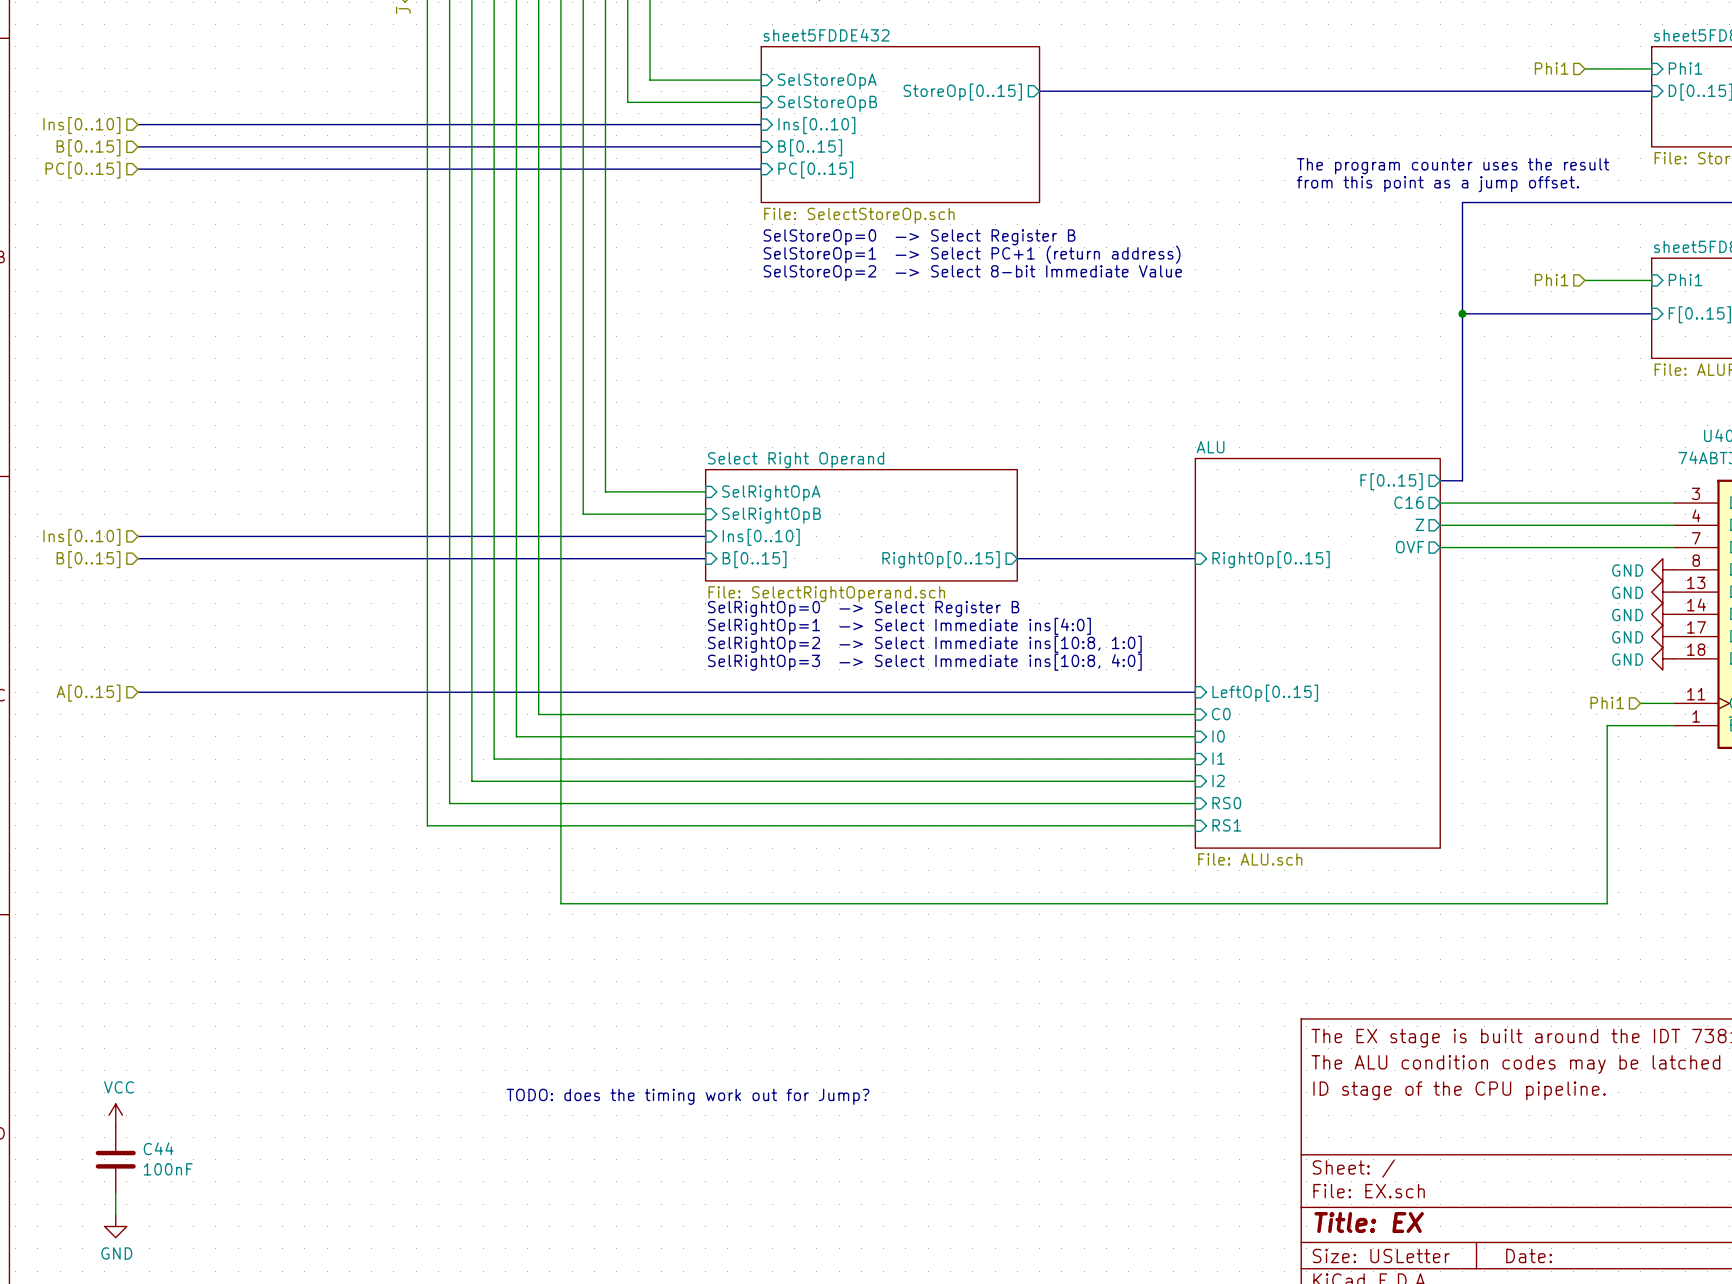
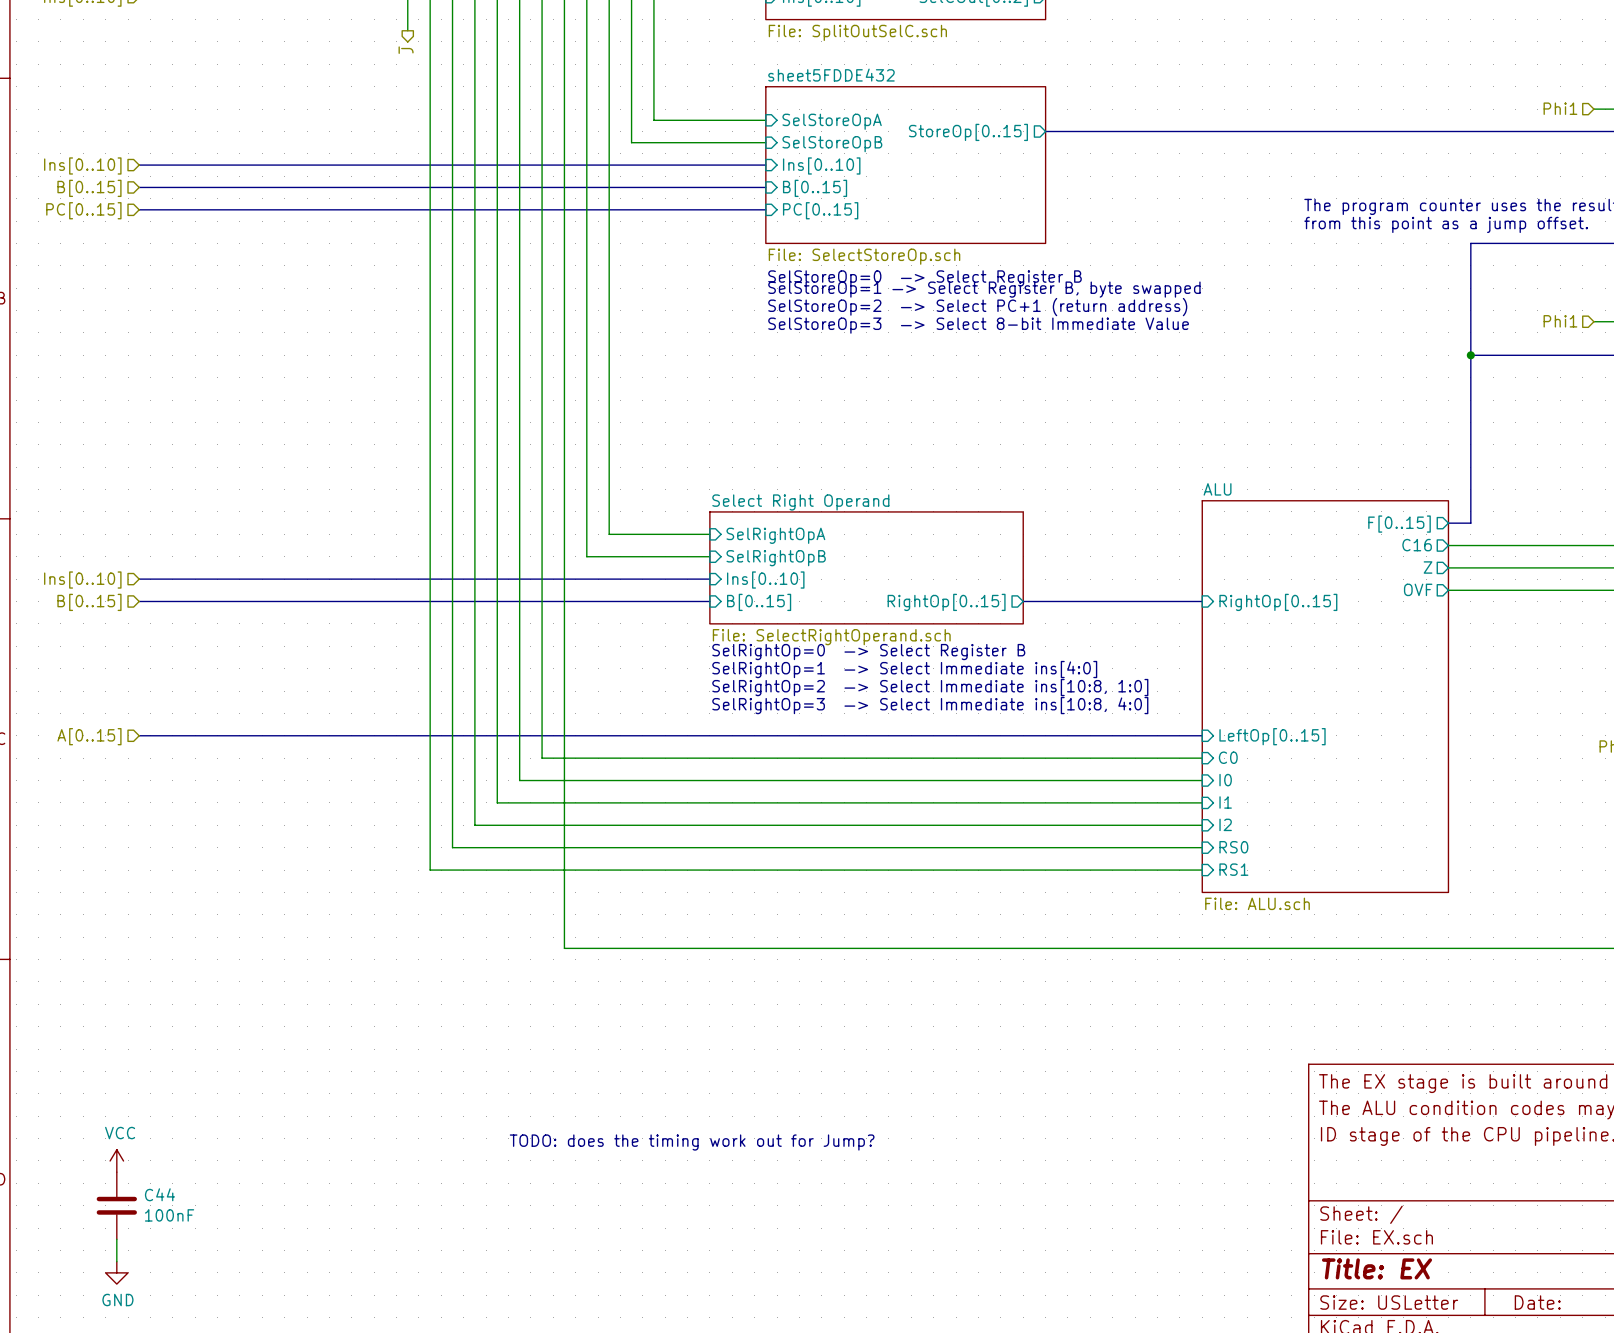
text: none -> SelStoreOp=1 —> Select Register B, byte swapped (984, 289)
text: SelStoreOp=1 —> Select PC+1 (return address) (972, 254) -> none
text: none -> SelStoreOp=2 —> Select PC+1 (return address) (977, 307)
text: SelStoreOp=2 —> Select 8-bit Immediate Value (972, 273) -> SelStoreOp=3 —> Select 8-bit Immediate Value (978, 325)

